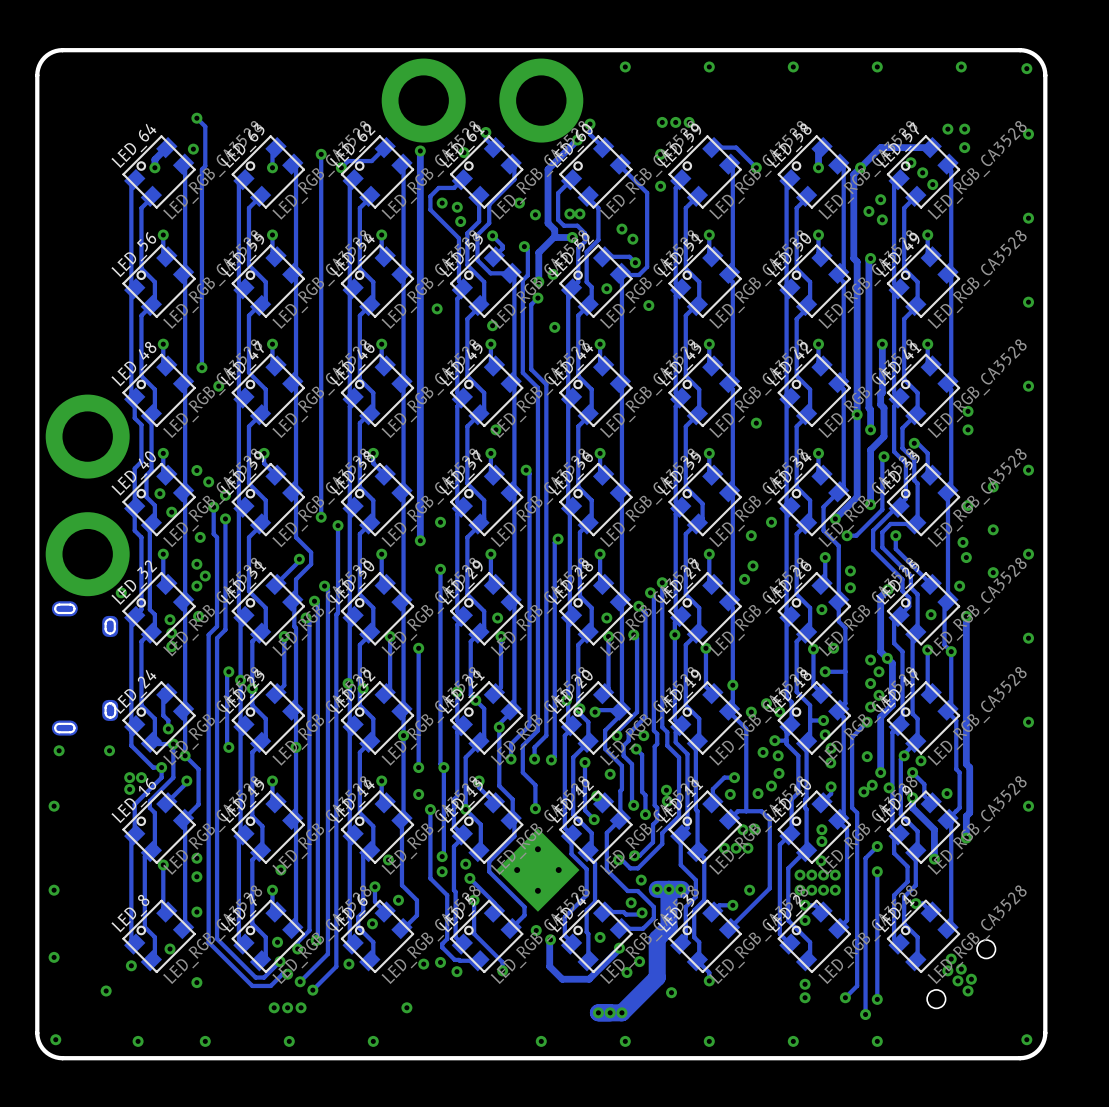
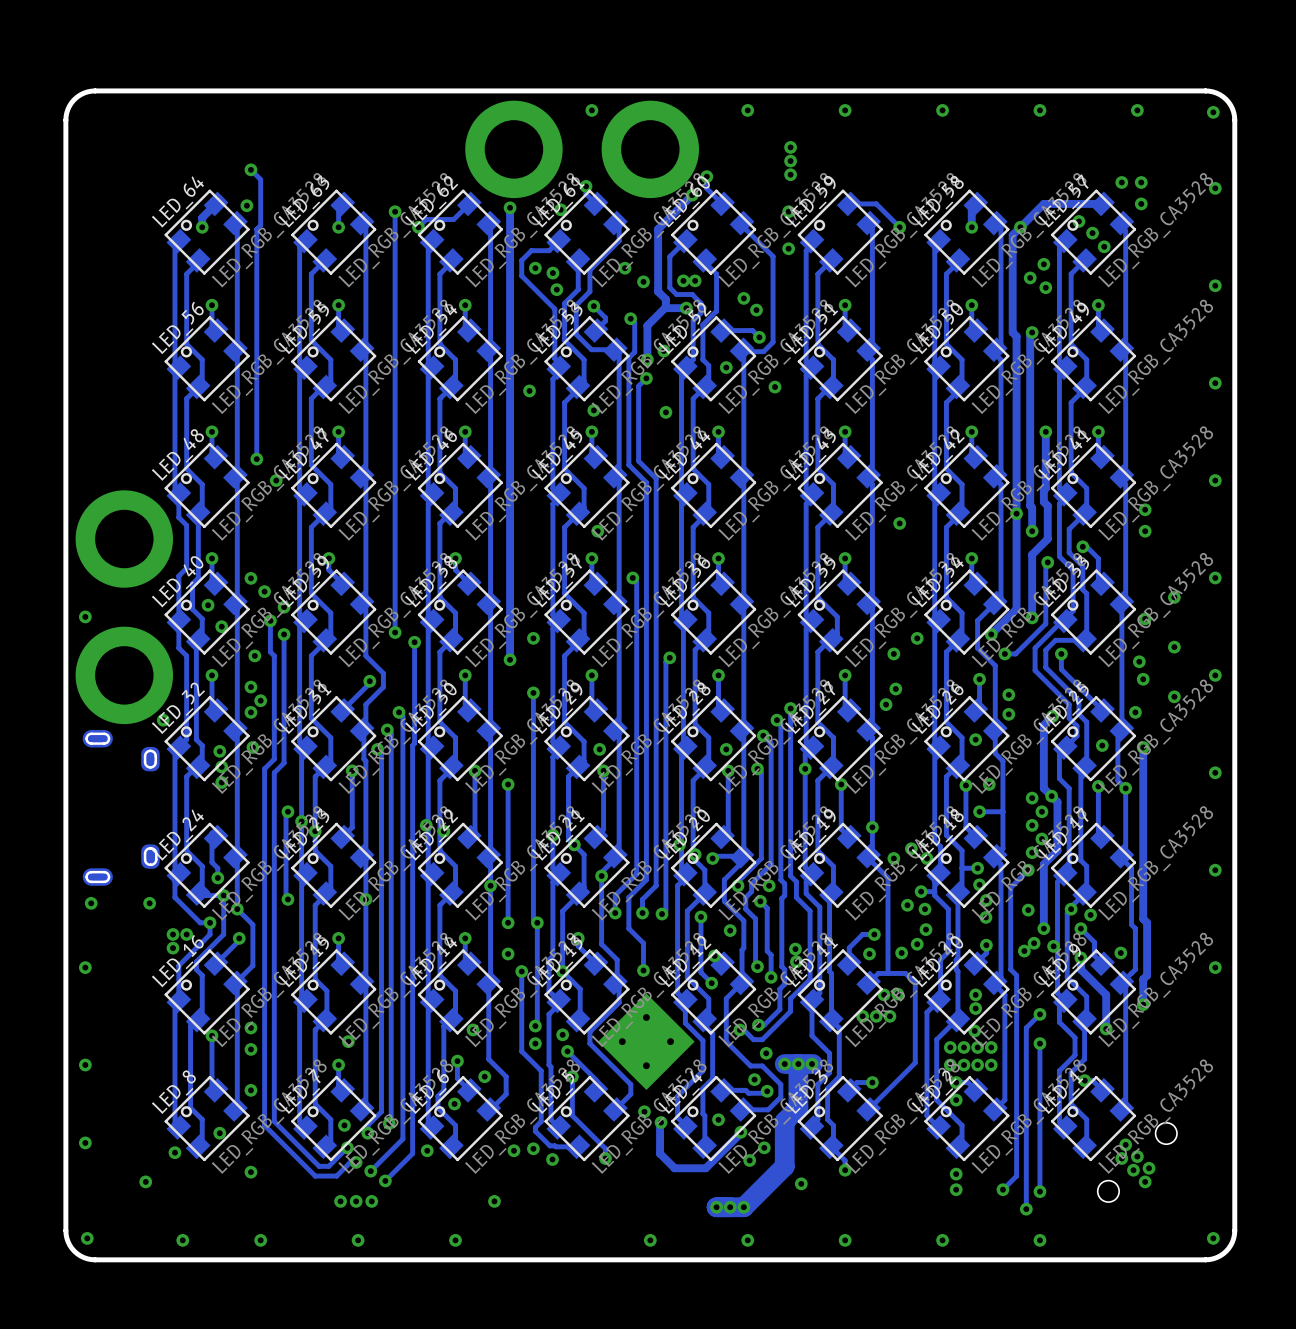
via: none -> (591, 110)
via: none -> (790, 147)
via: none -> (790, 161)
via: (675, 122) -> none
via: (689, 122) -> none
via: none -> (85, 616)
via: (749, 890) -> none

